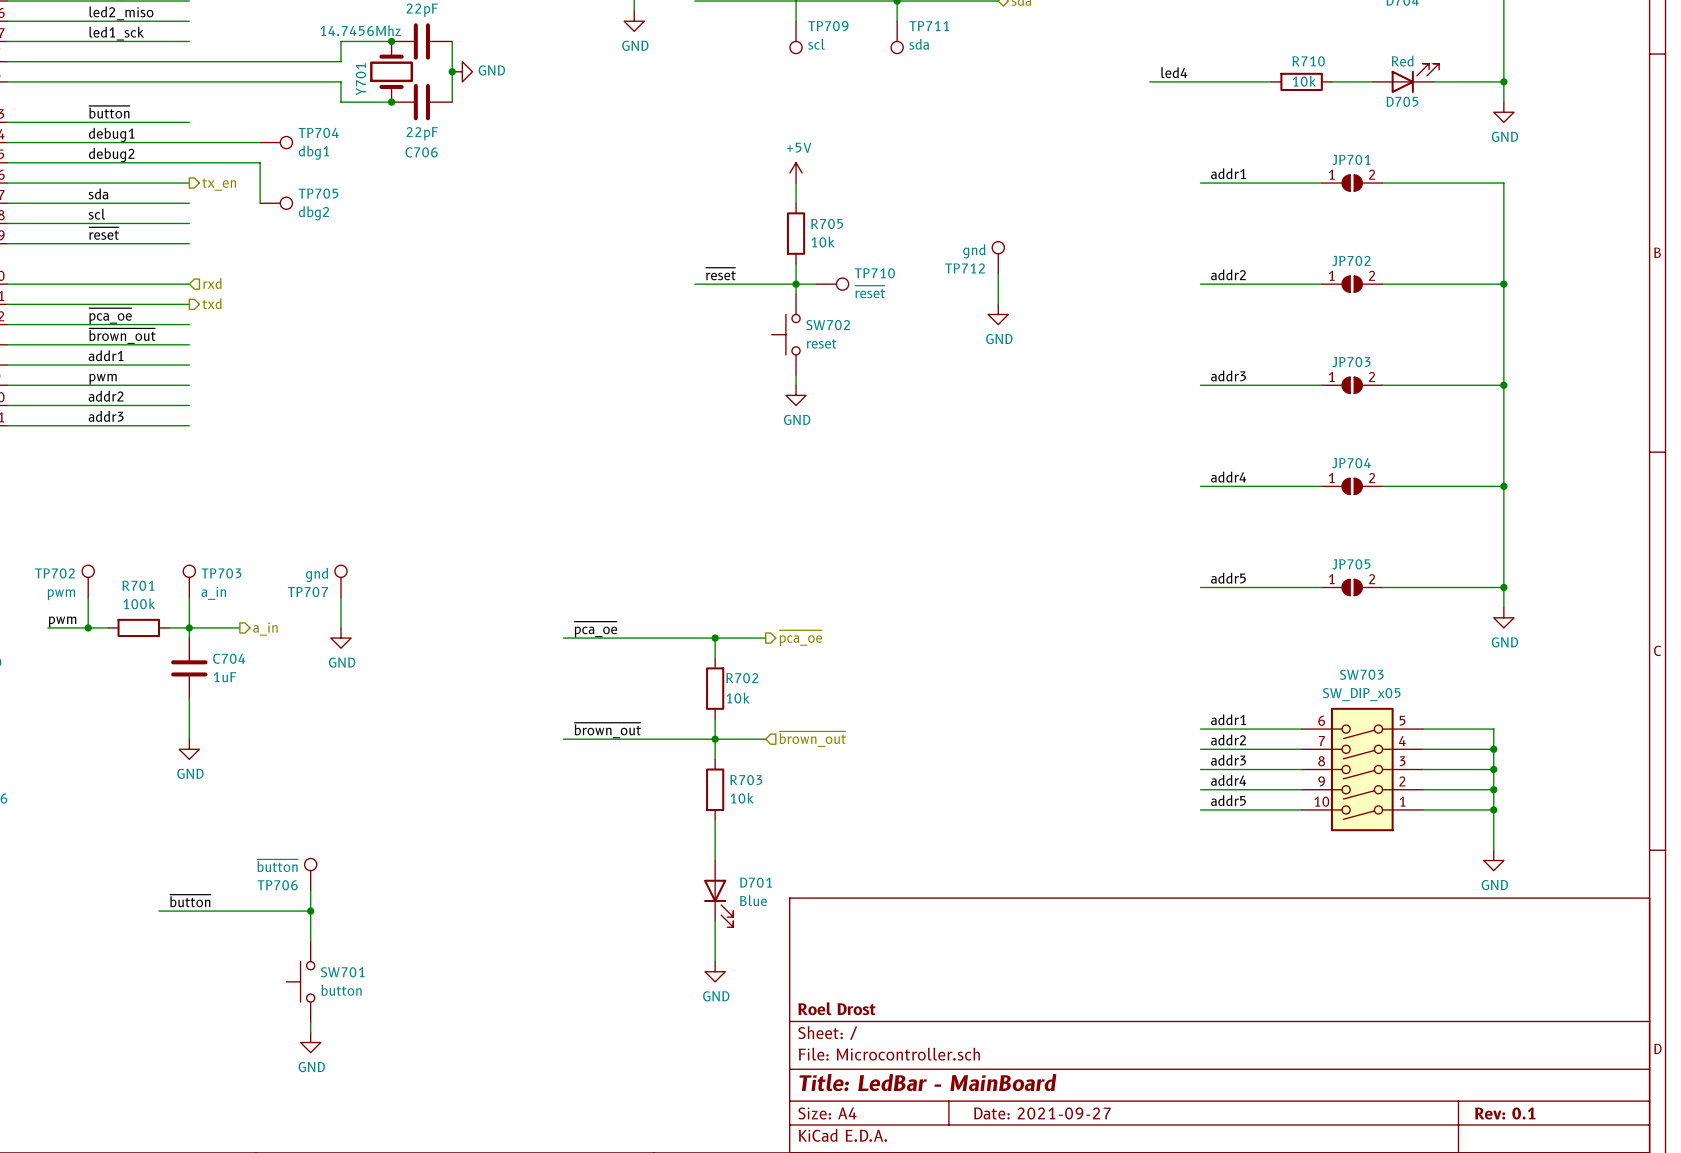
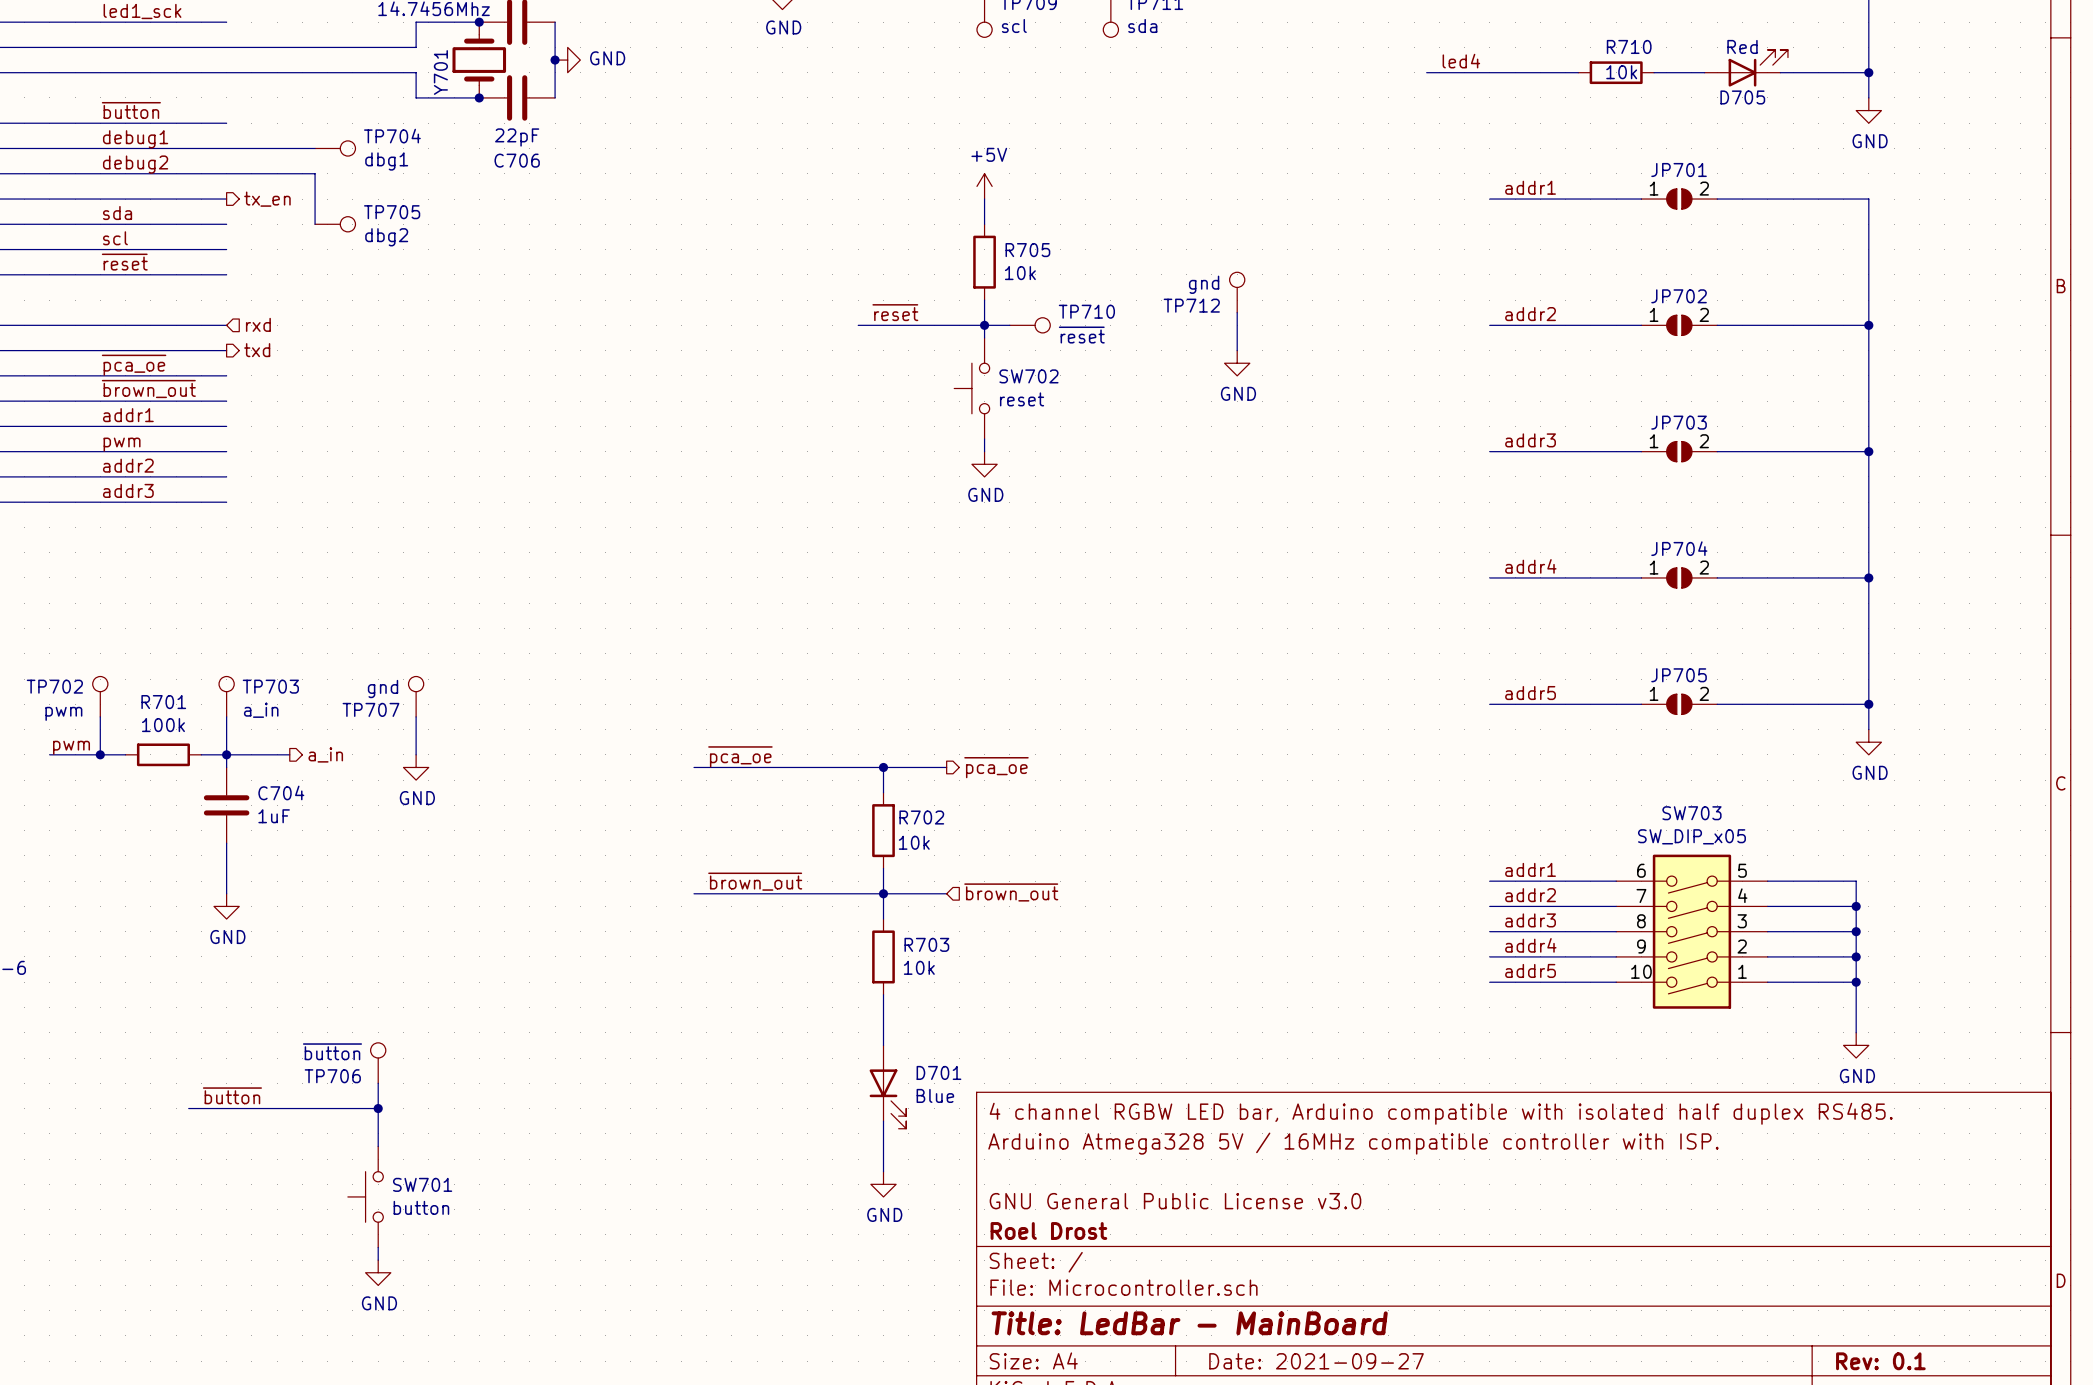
title block: none -> 4 channel RGBW LED bar, Arduino compatible with isolated half duplex RS485. (1441, 1113)
title block: none -> Arduino Atmega328 5V / 16MHz compatible controller with ISP. (1353, 1143)
title block: none -> GNU General Public License v3.0 (1175, 1201)

